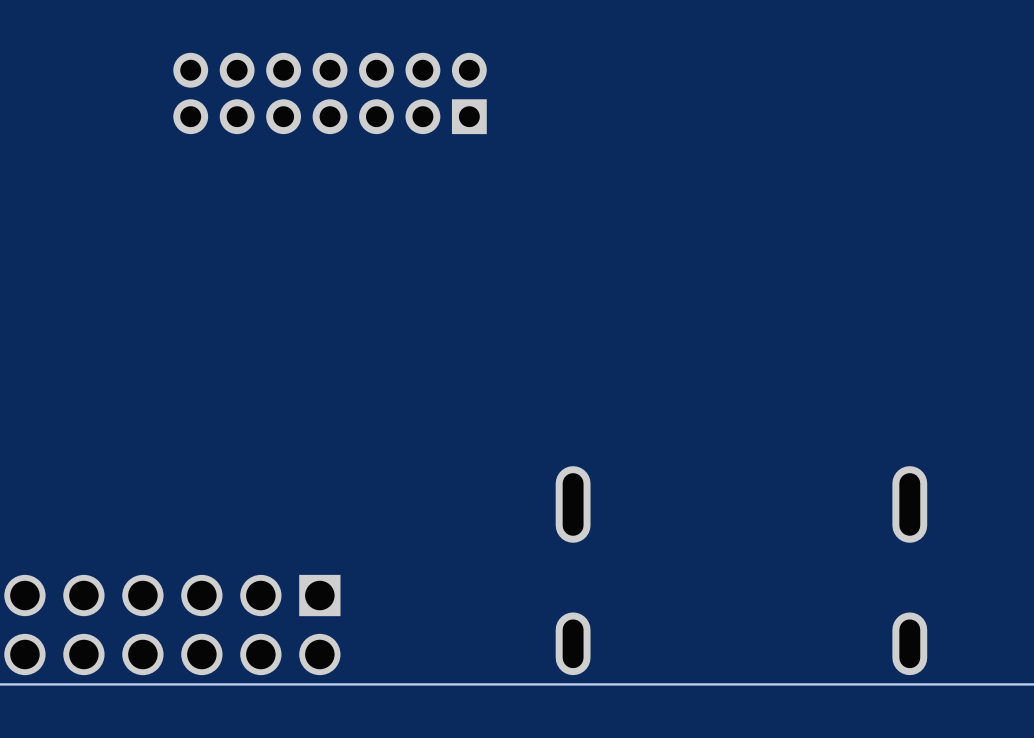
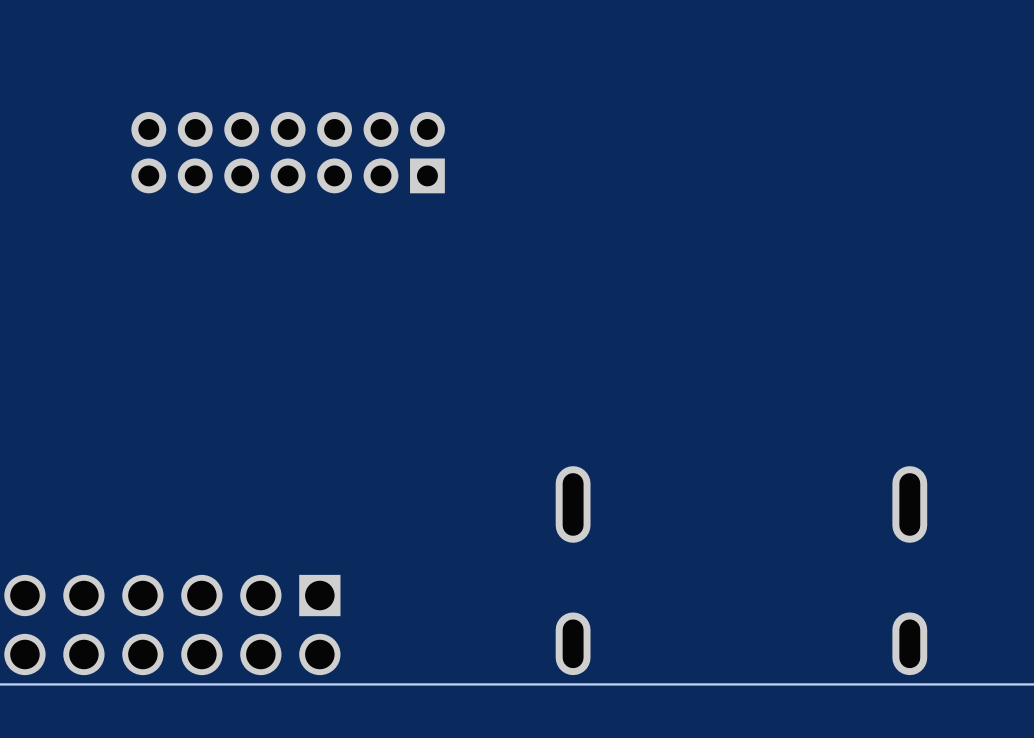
part position: (330, 93) -> (288, 152)

